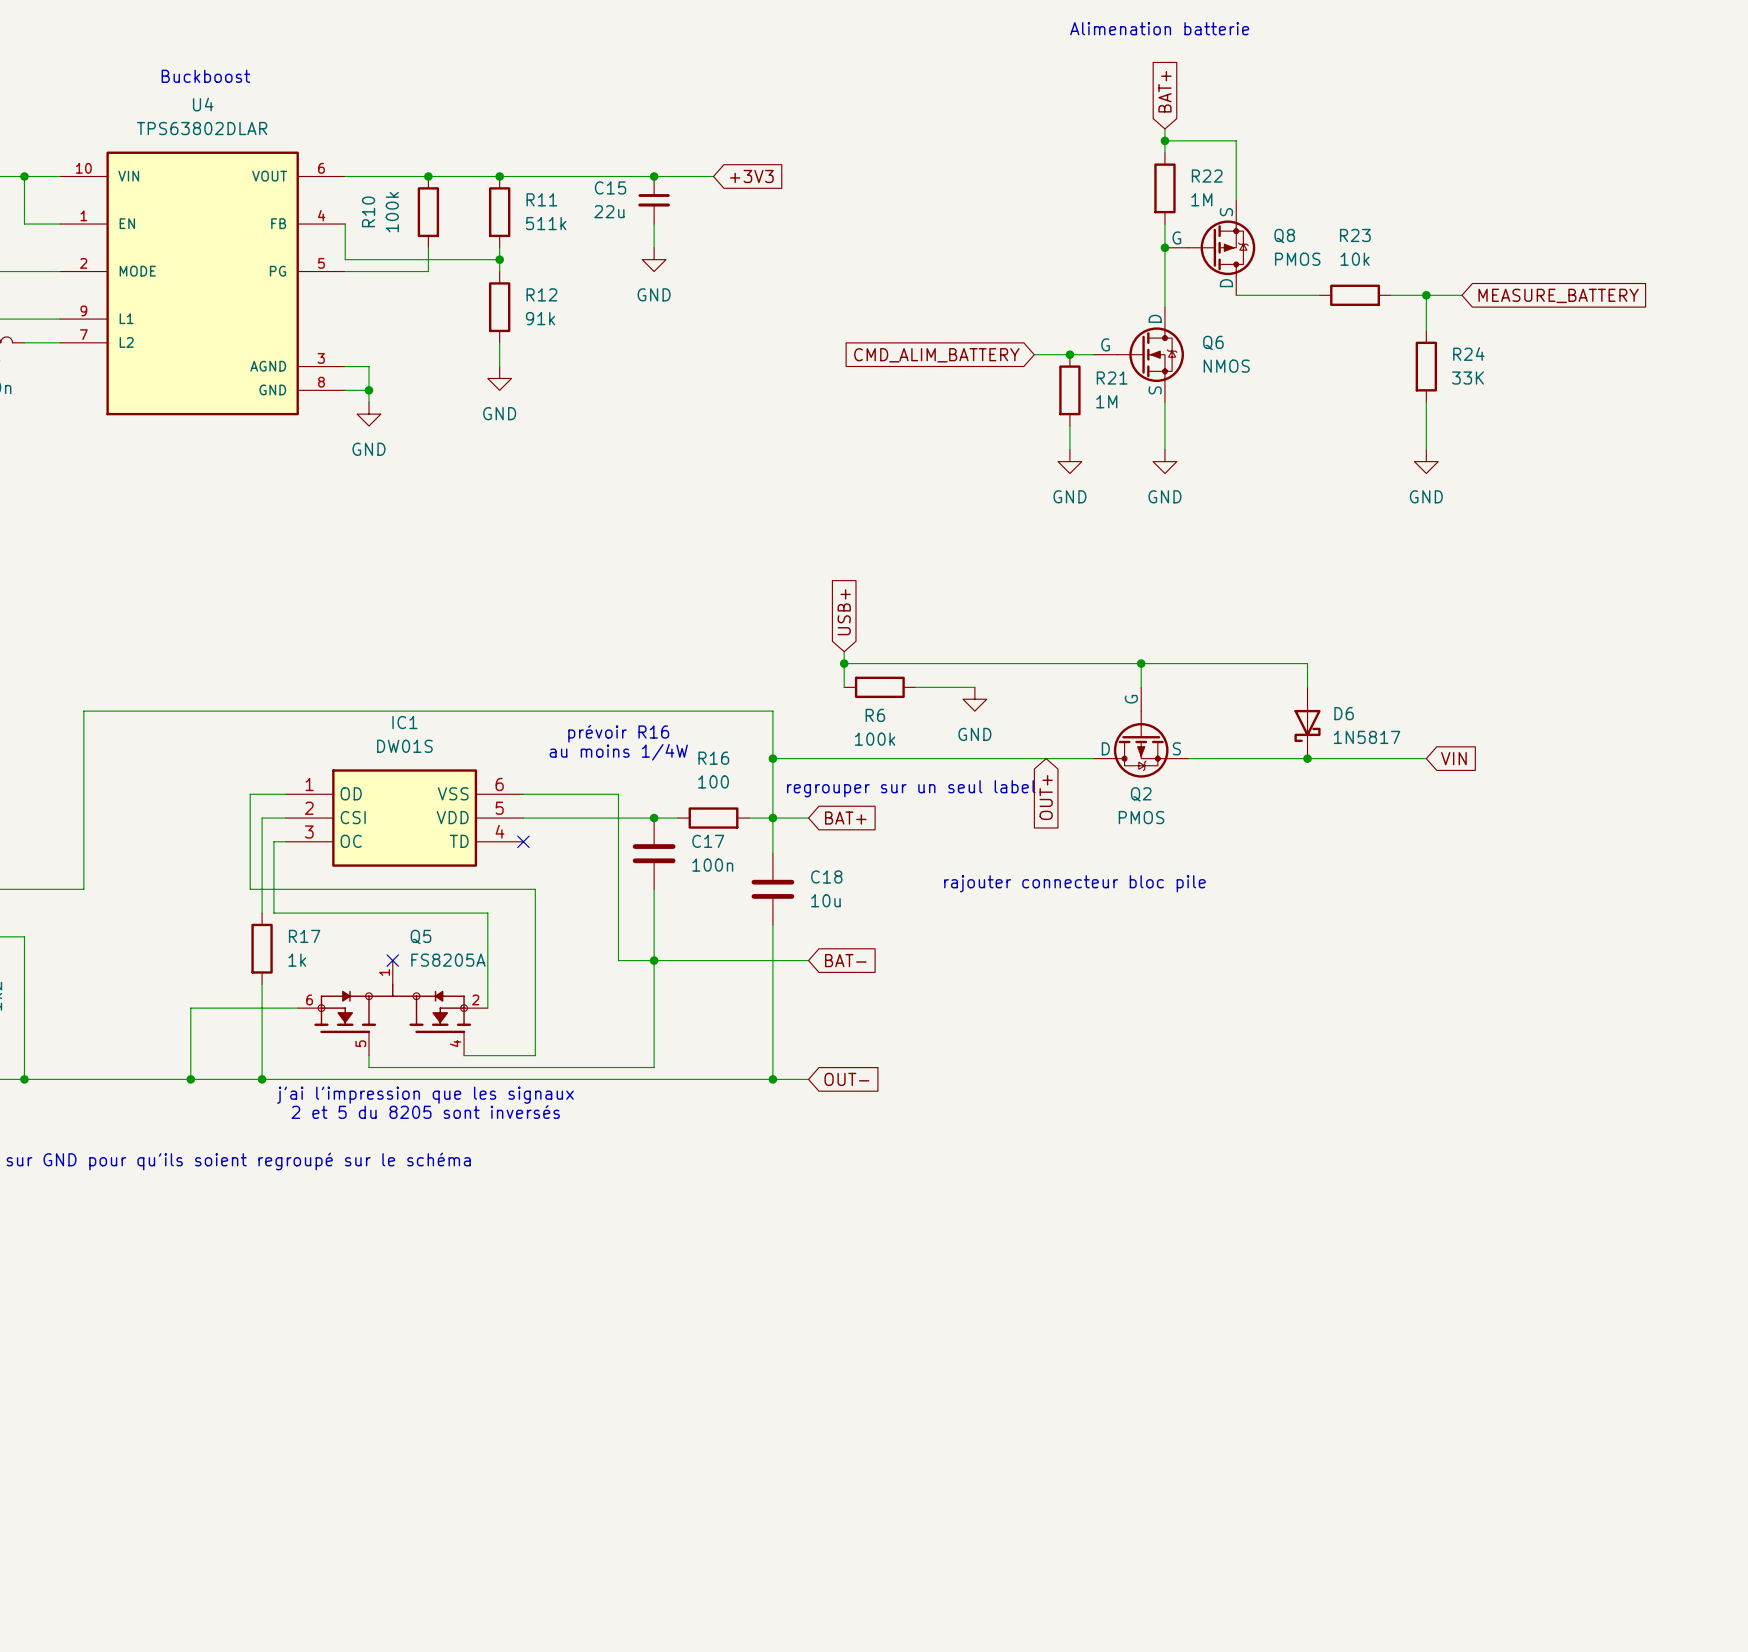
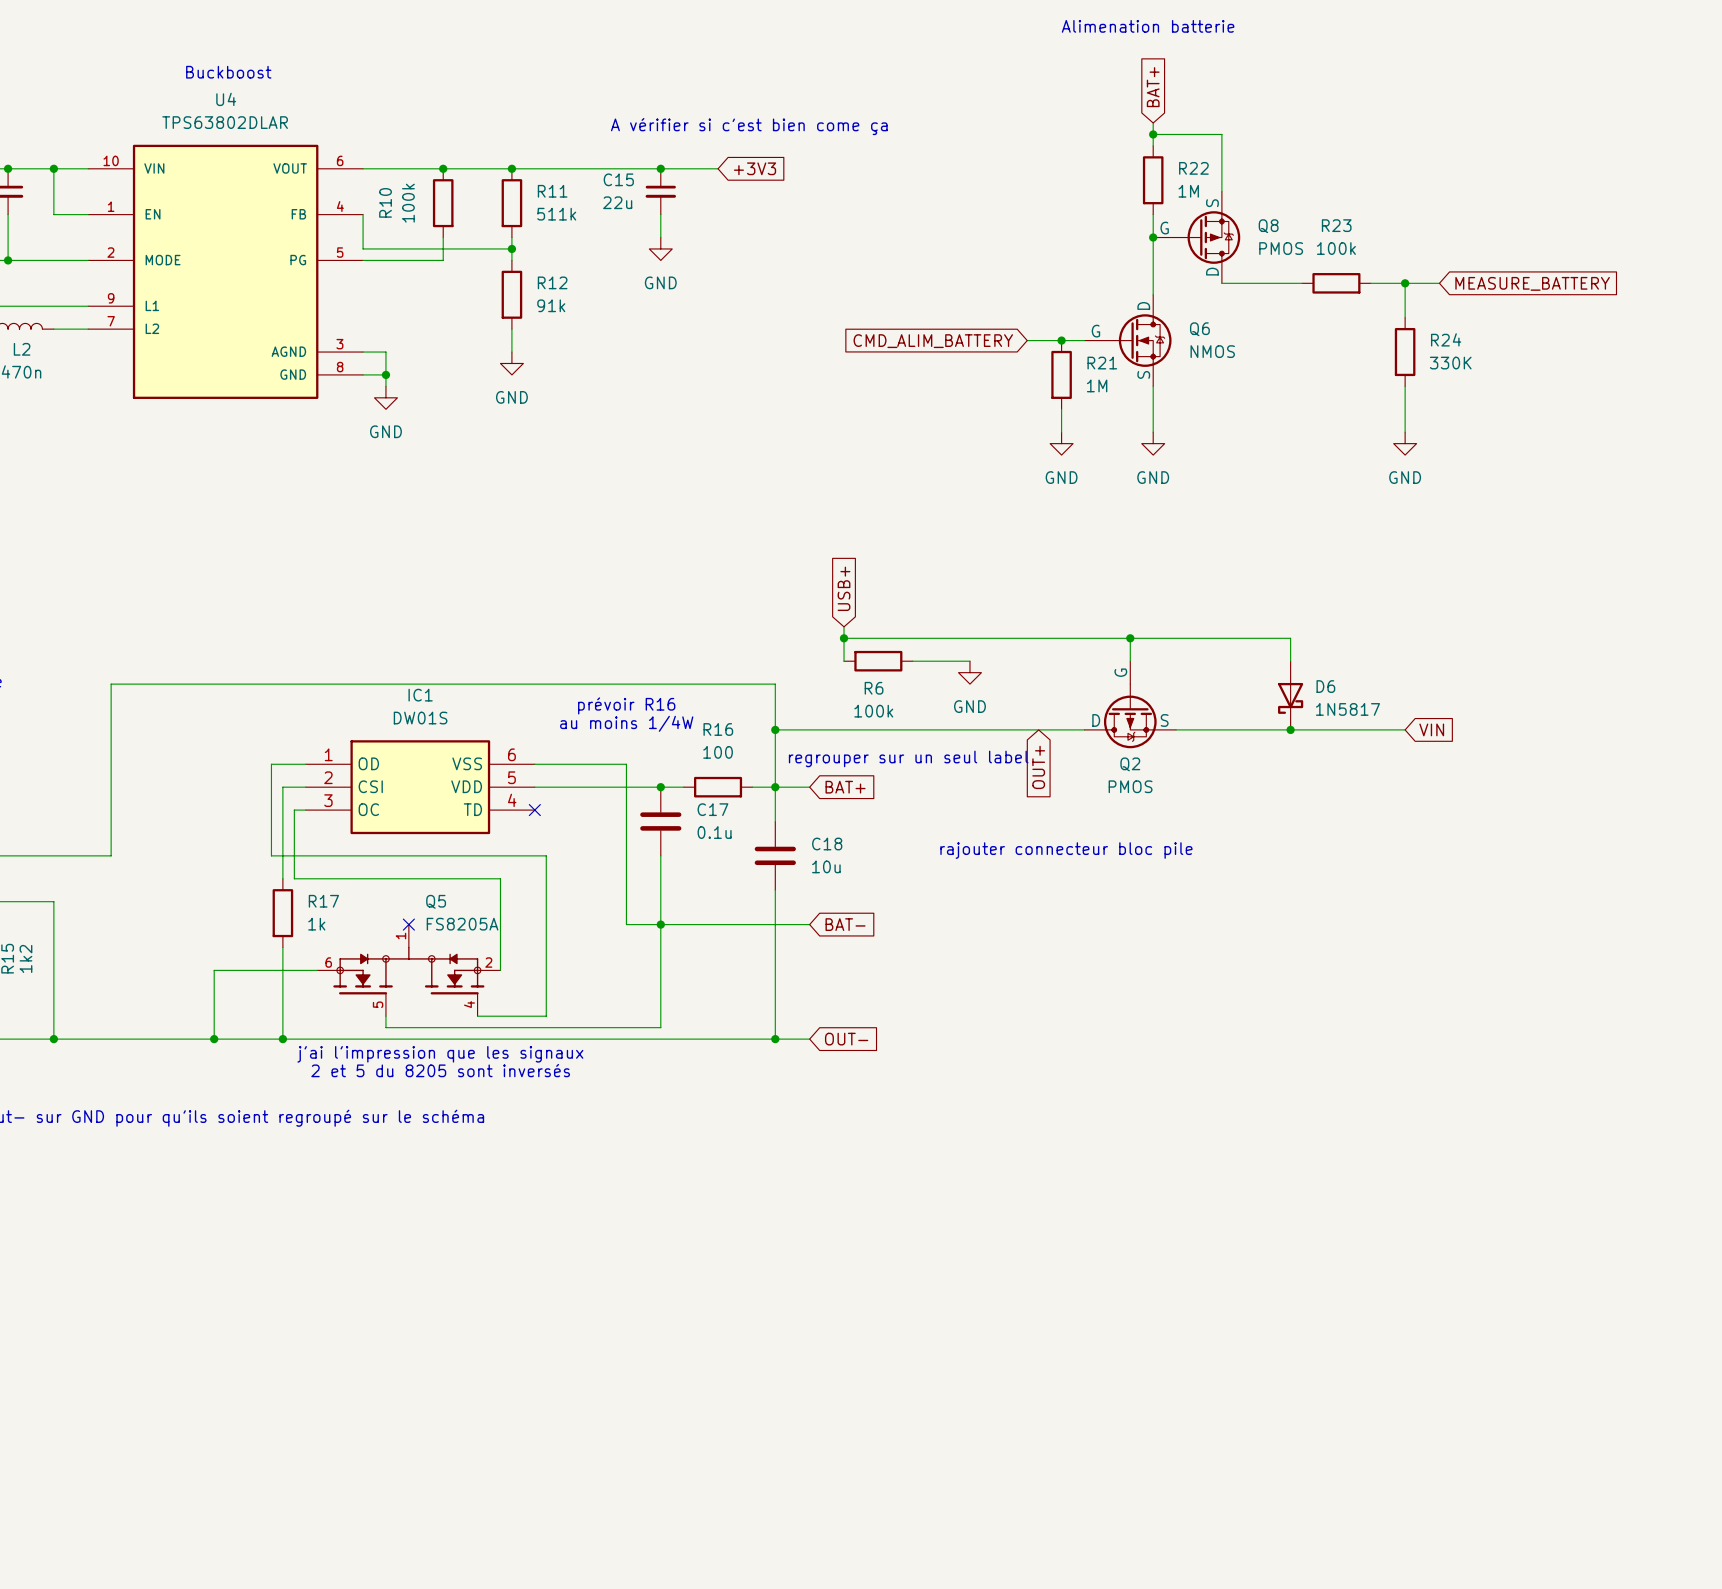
text: none -> A vérifier si c'est bien come ça (749, 126)
R23 value: 10k (1355, 259) -> 100k (1336, 248)
R24 value: 33K (1468, 378) -> 330K (1450, 363)
C17 value: 100n (712, 865) -> 0.1u (714, 832)

